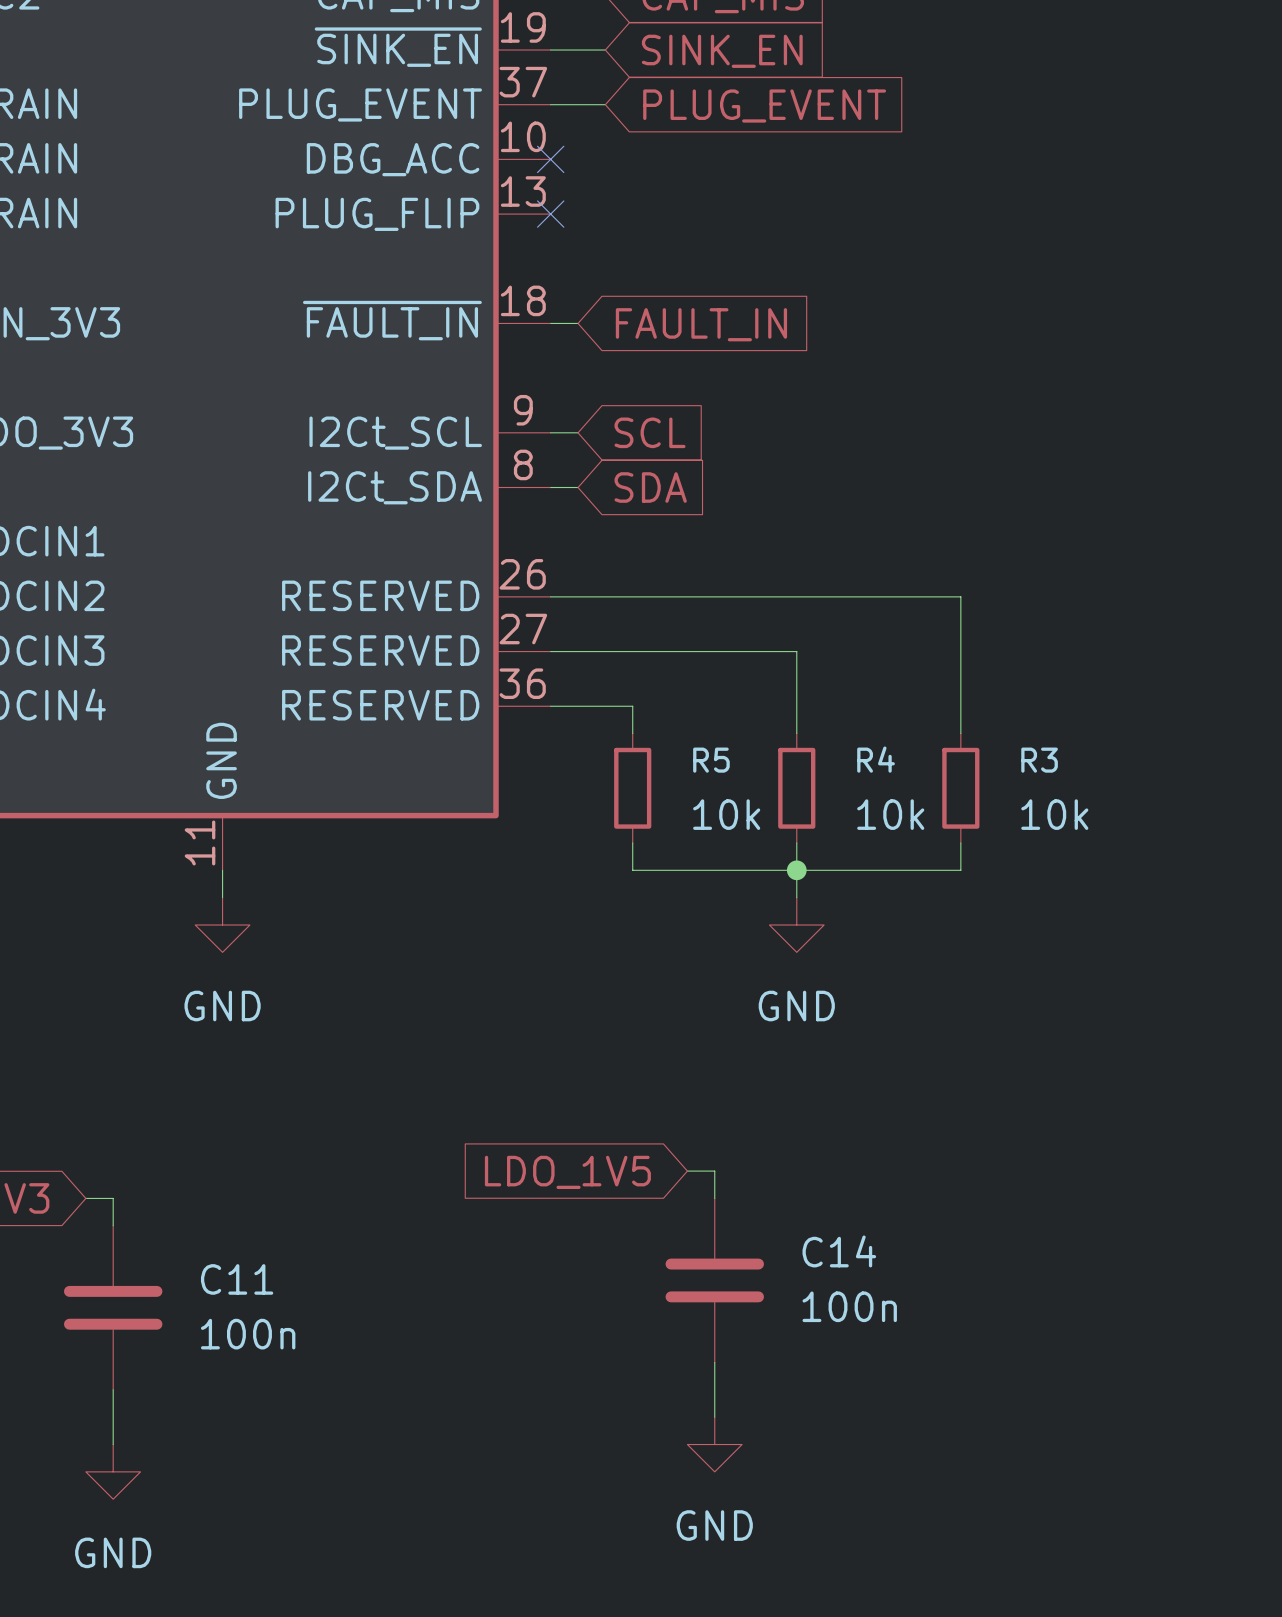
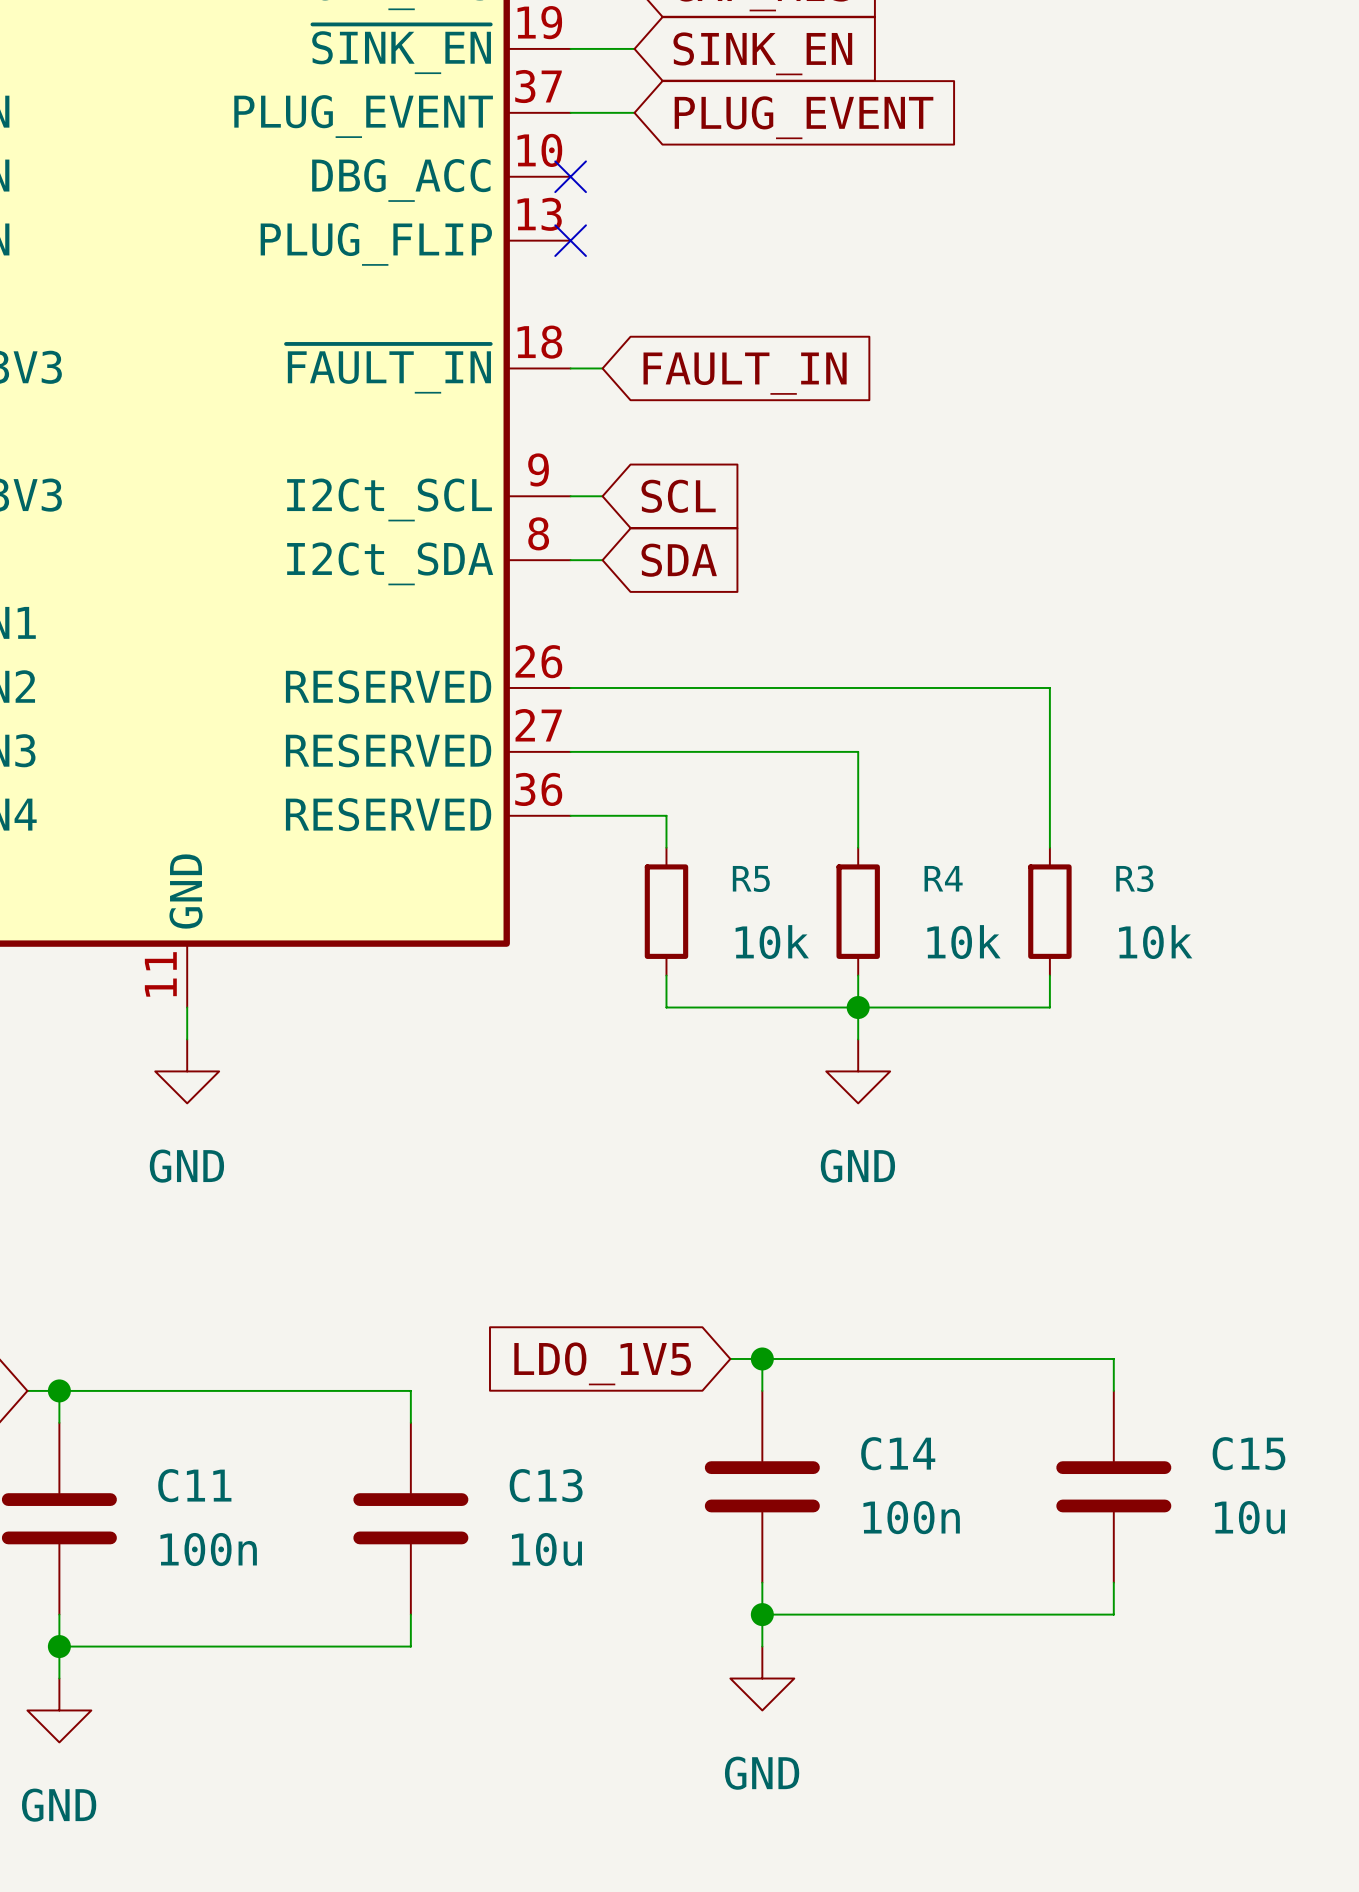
wire: none -> (762, 1358) (1113, 1358) (1113, 1390)
junction: none -> (762, 1358)
wire: none -> (59, 1390) (410, 1390) (410, 1422)
junction: none -> (59, 1390)
C15: none -> 10u (1113, 1486)
C13: none -> 10u (410, 1518)
wire: none -> (1113, 1582) (1113, 1614) (762, 1614)
wire: none -> (410, 1614) (410, 1646) (59, 1646)
junction: none -> (762, 1614)
junction: none -> (59, 1646)

